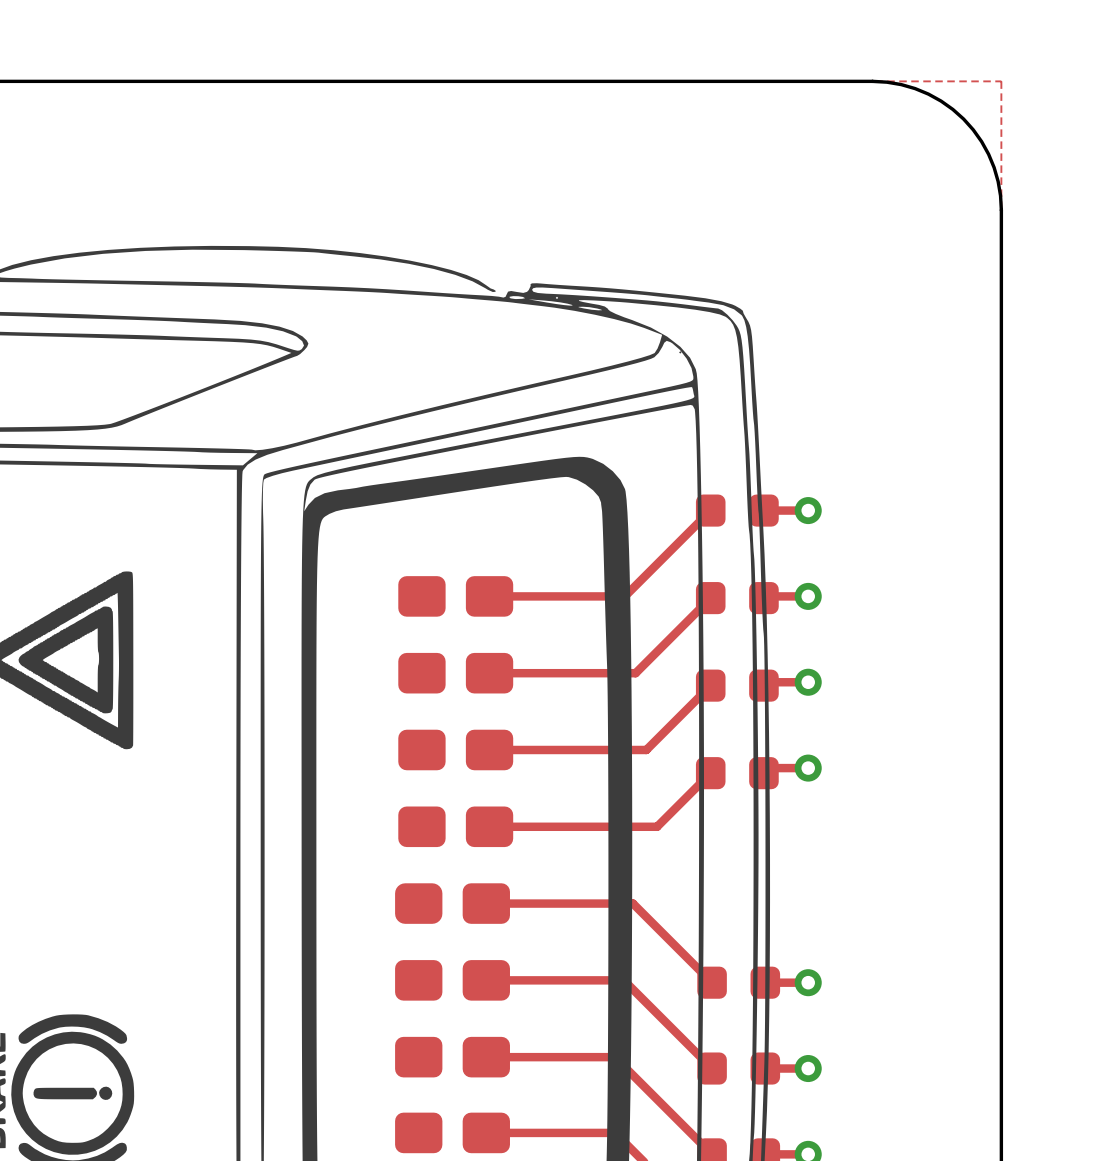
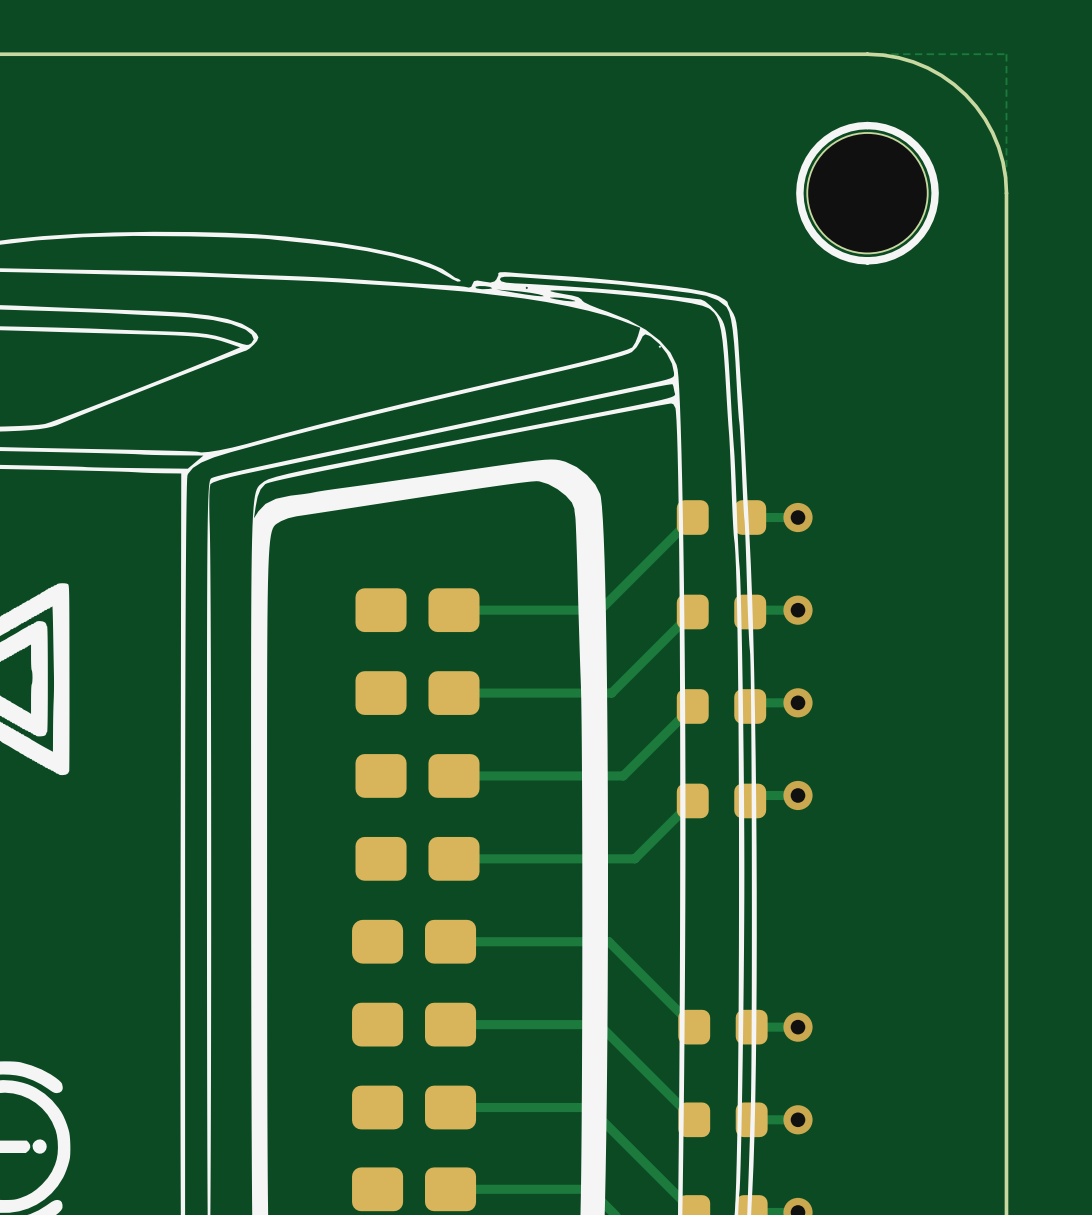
part: none -> (867, 193)

